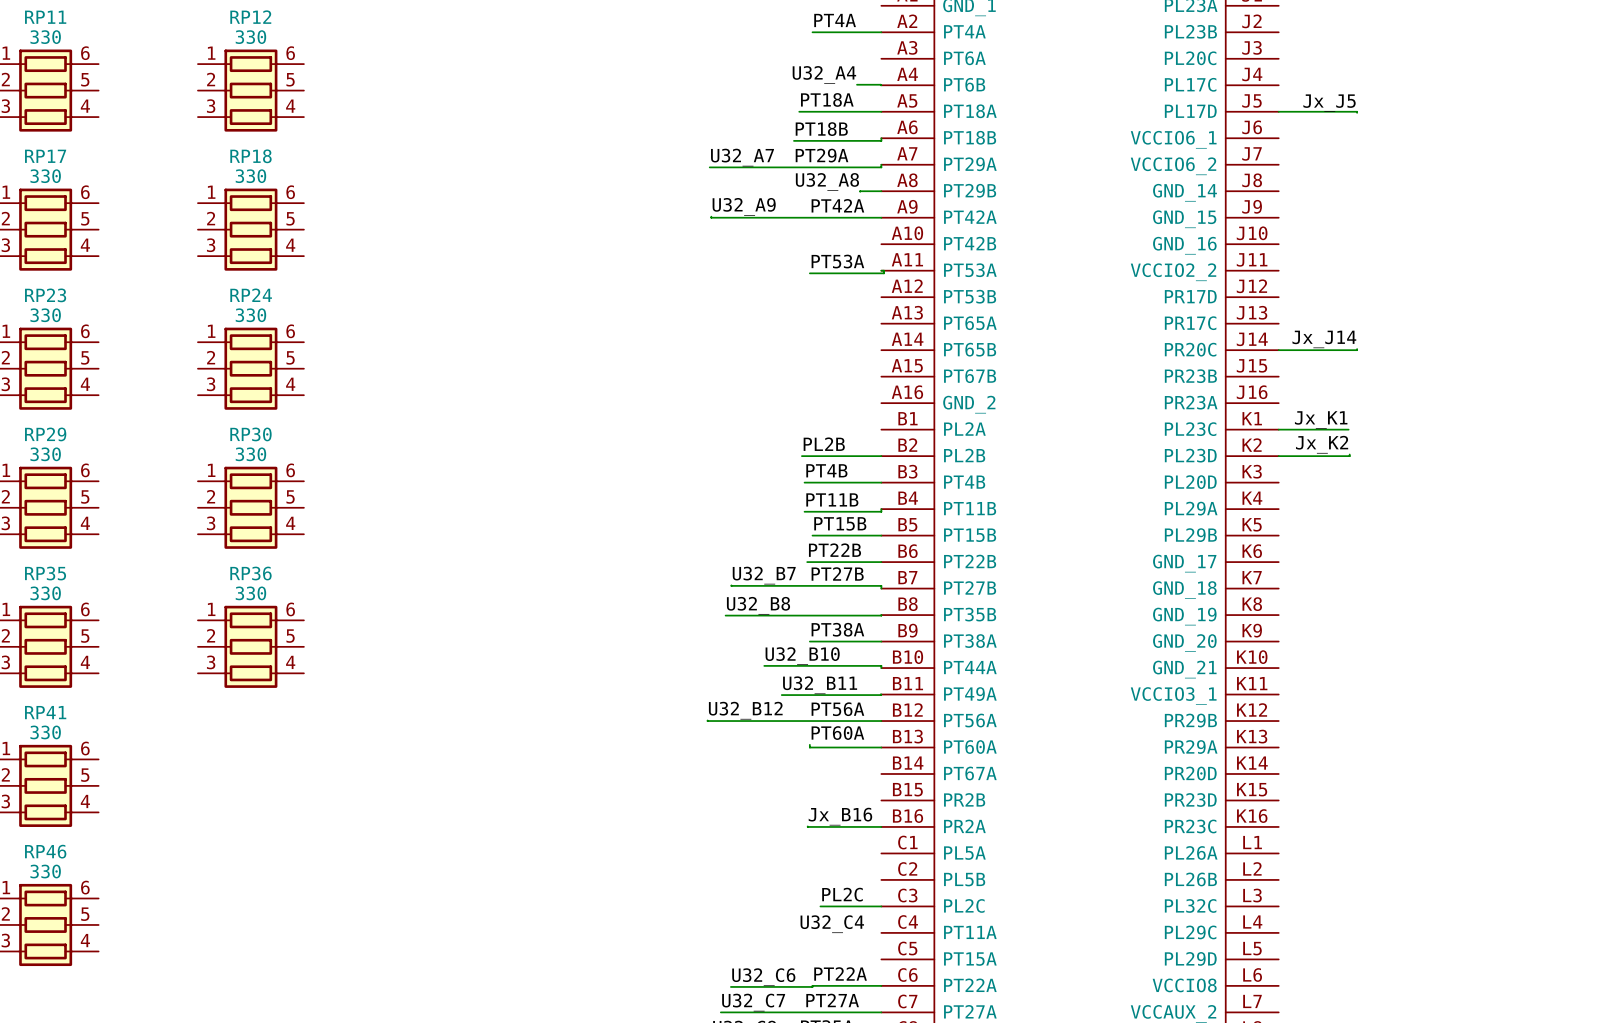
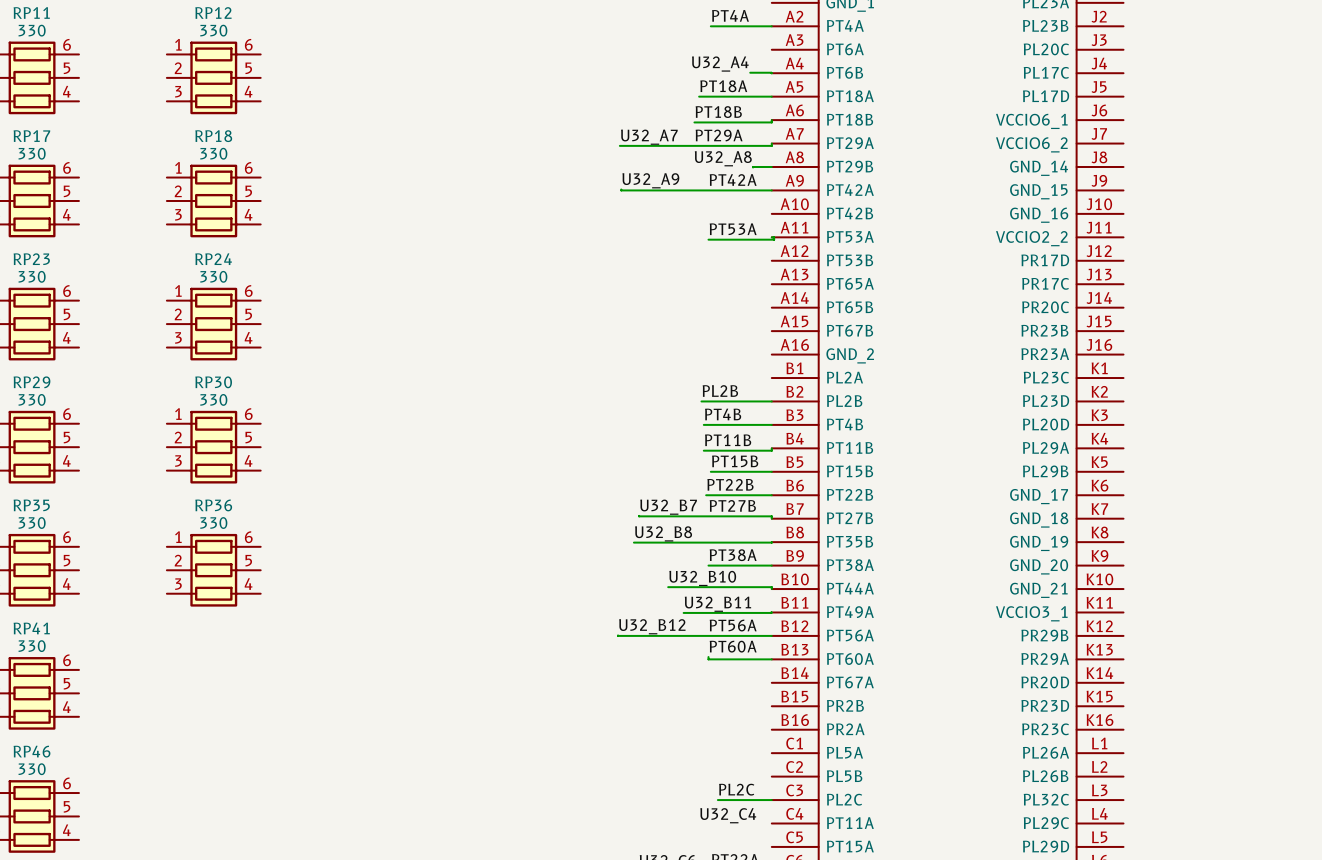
label: Jx_J5 (1329, 103) -> none
wire: (1278, 111) (1357, 112) -> none
label: Jx_J14 (1324, 339) -> none
wire: (1357, 349) (1278, 350) -> none
label: Jx_K1 (1321, 419) -> none
wire: (1278, 429) (1348, 429) -> none
label: Jx_K2 (1322, 444) -> none
wire: (1349, 454) (1349, 456) (1278, 456) -> none
label: Jx_B16 (840, 816) -> none
wire: (807, 826) (881, 826) -> none

